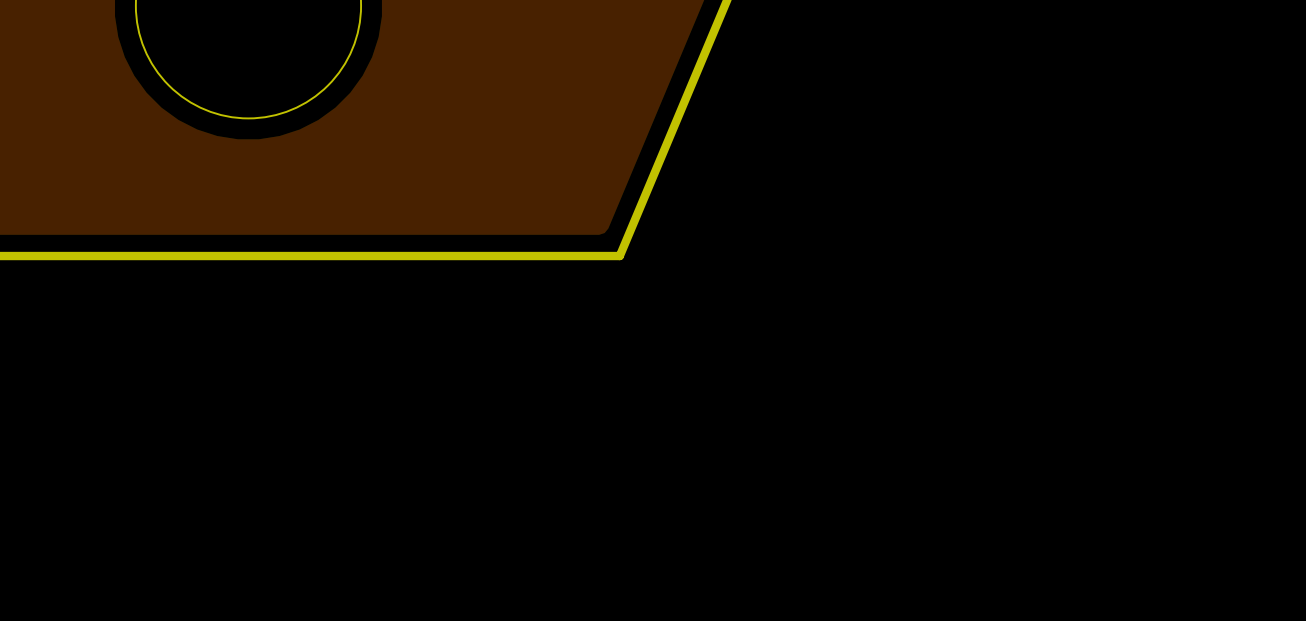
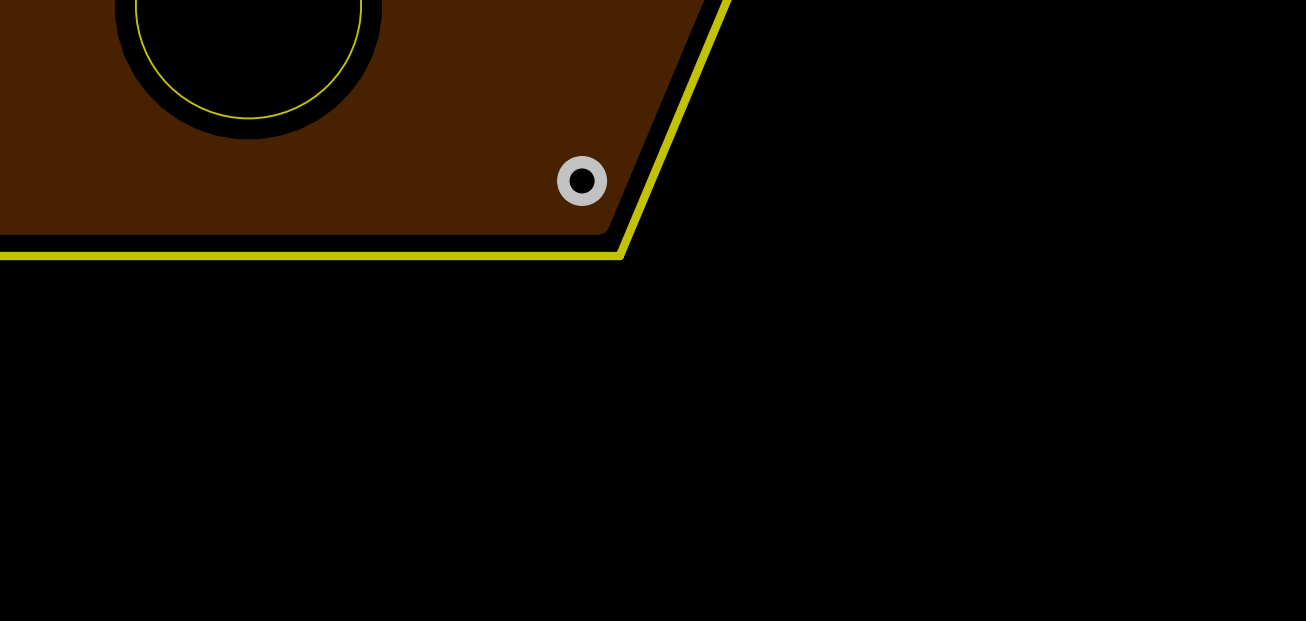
via: none -> (582, 180)

